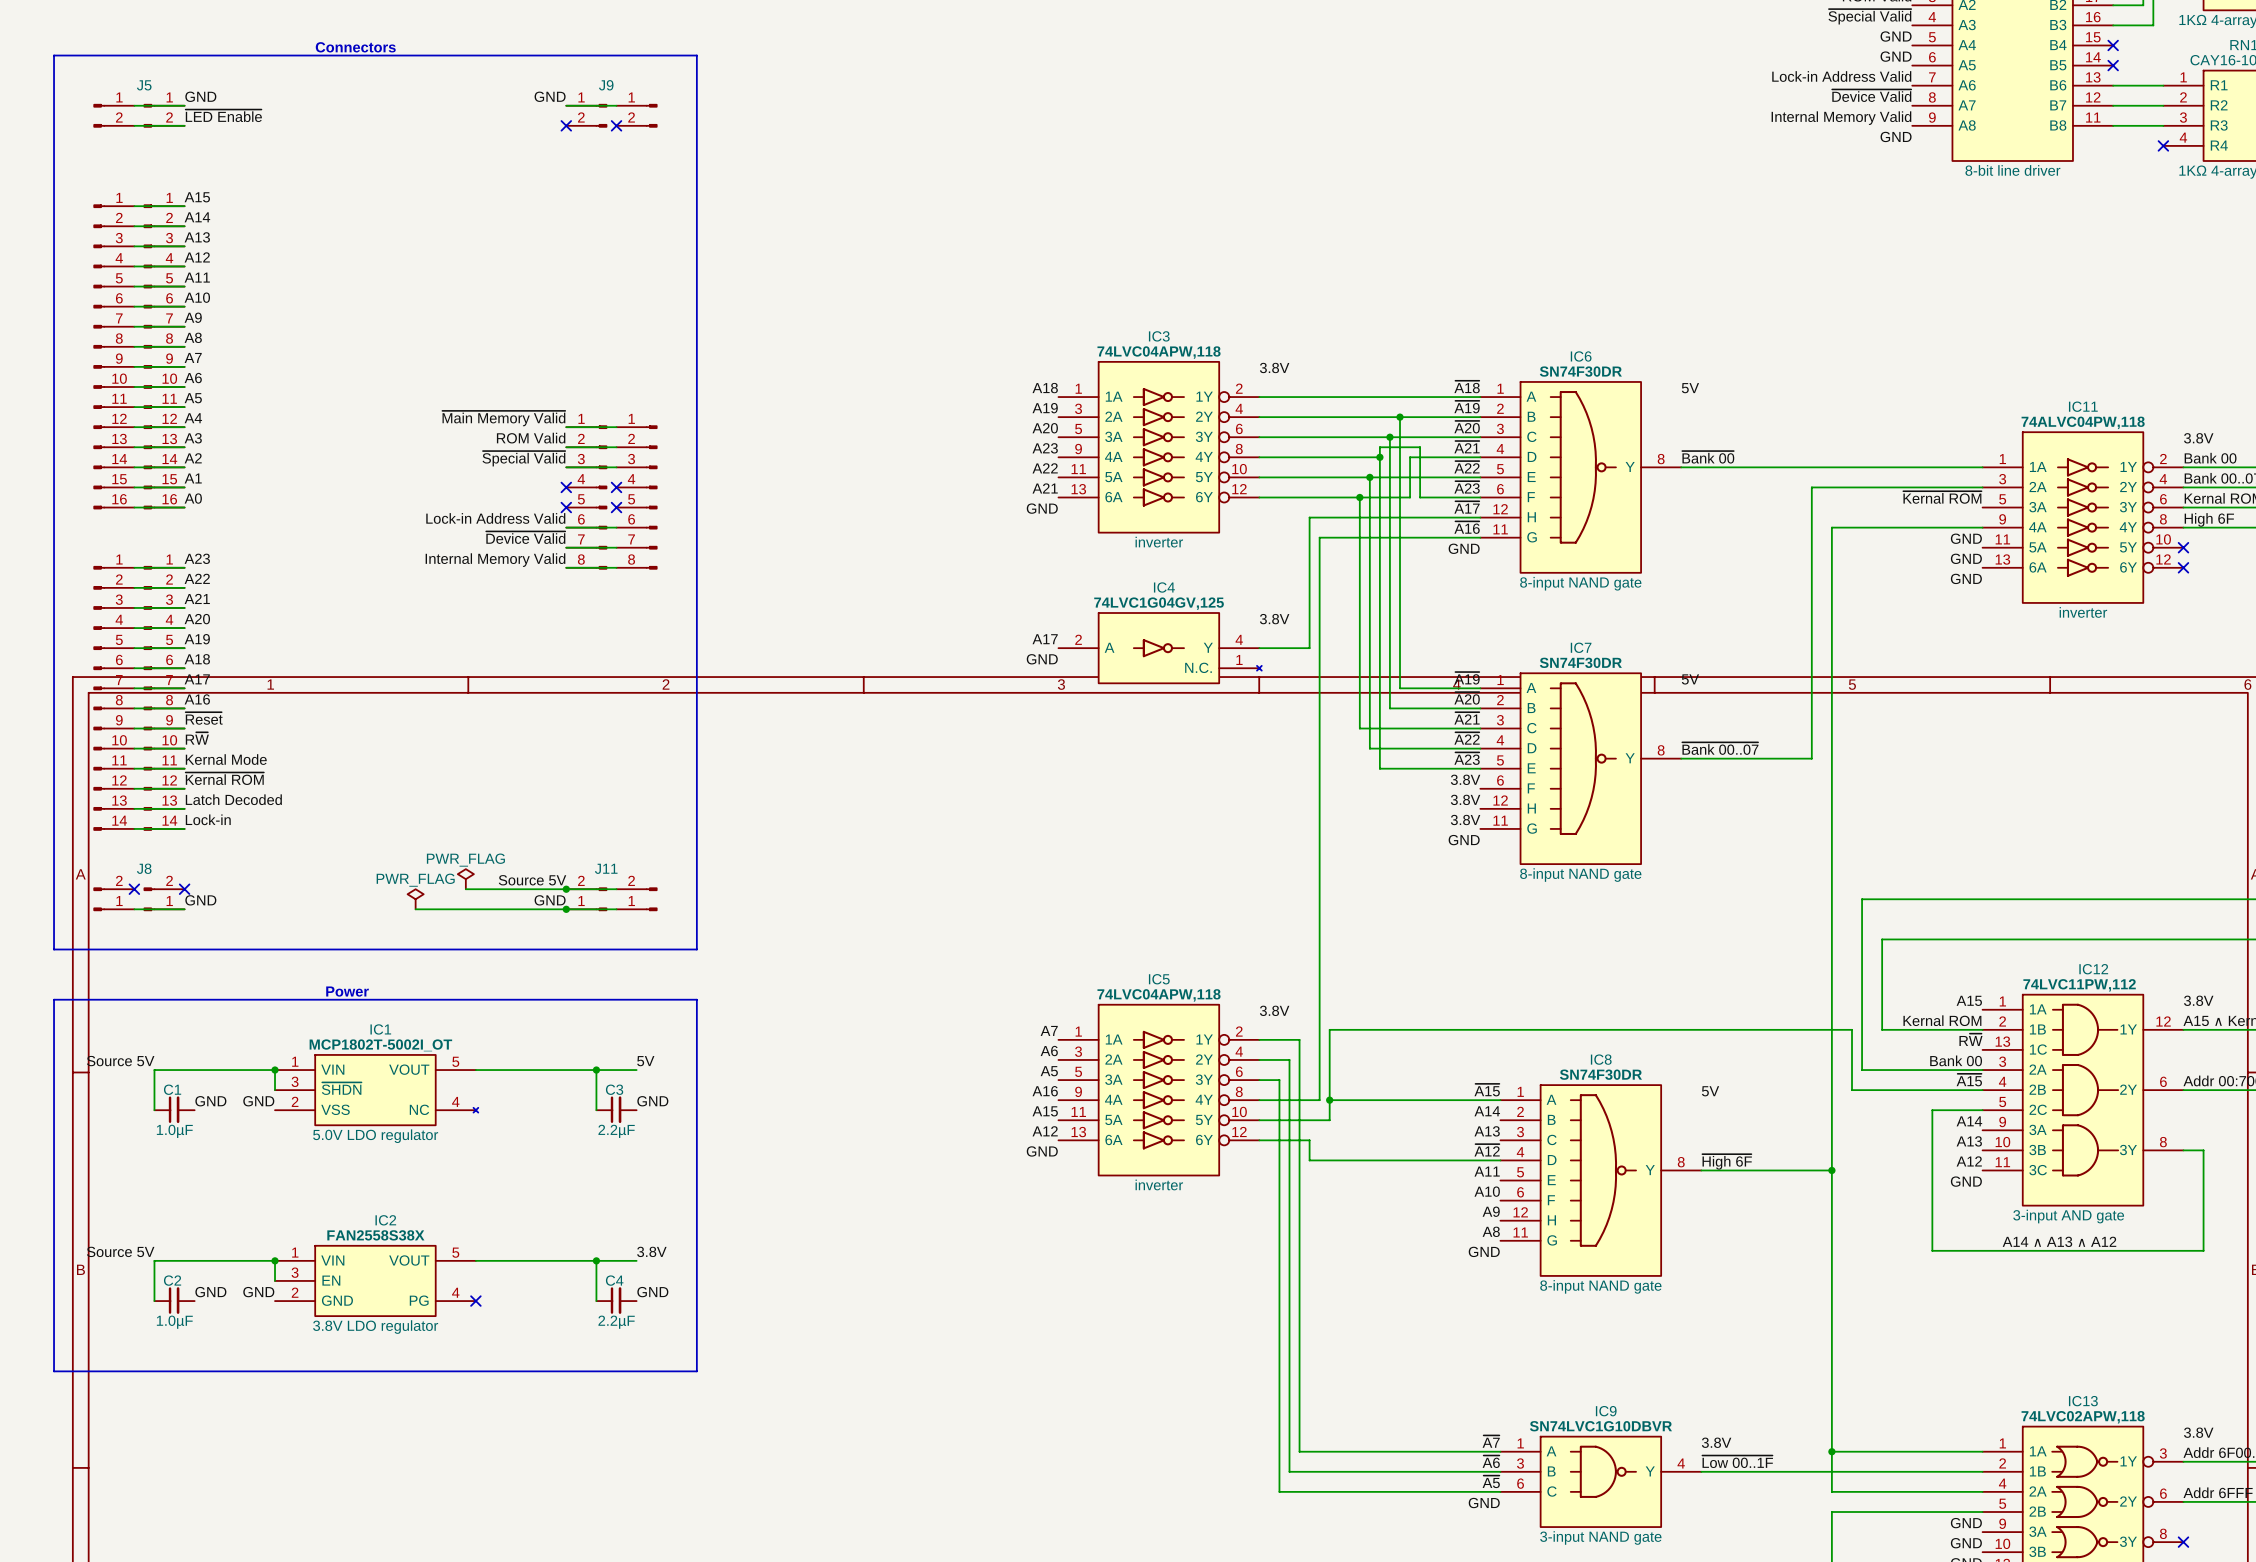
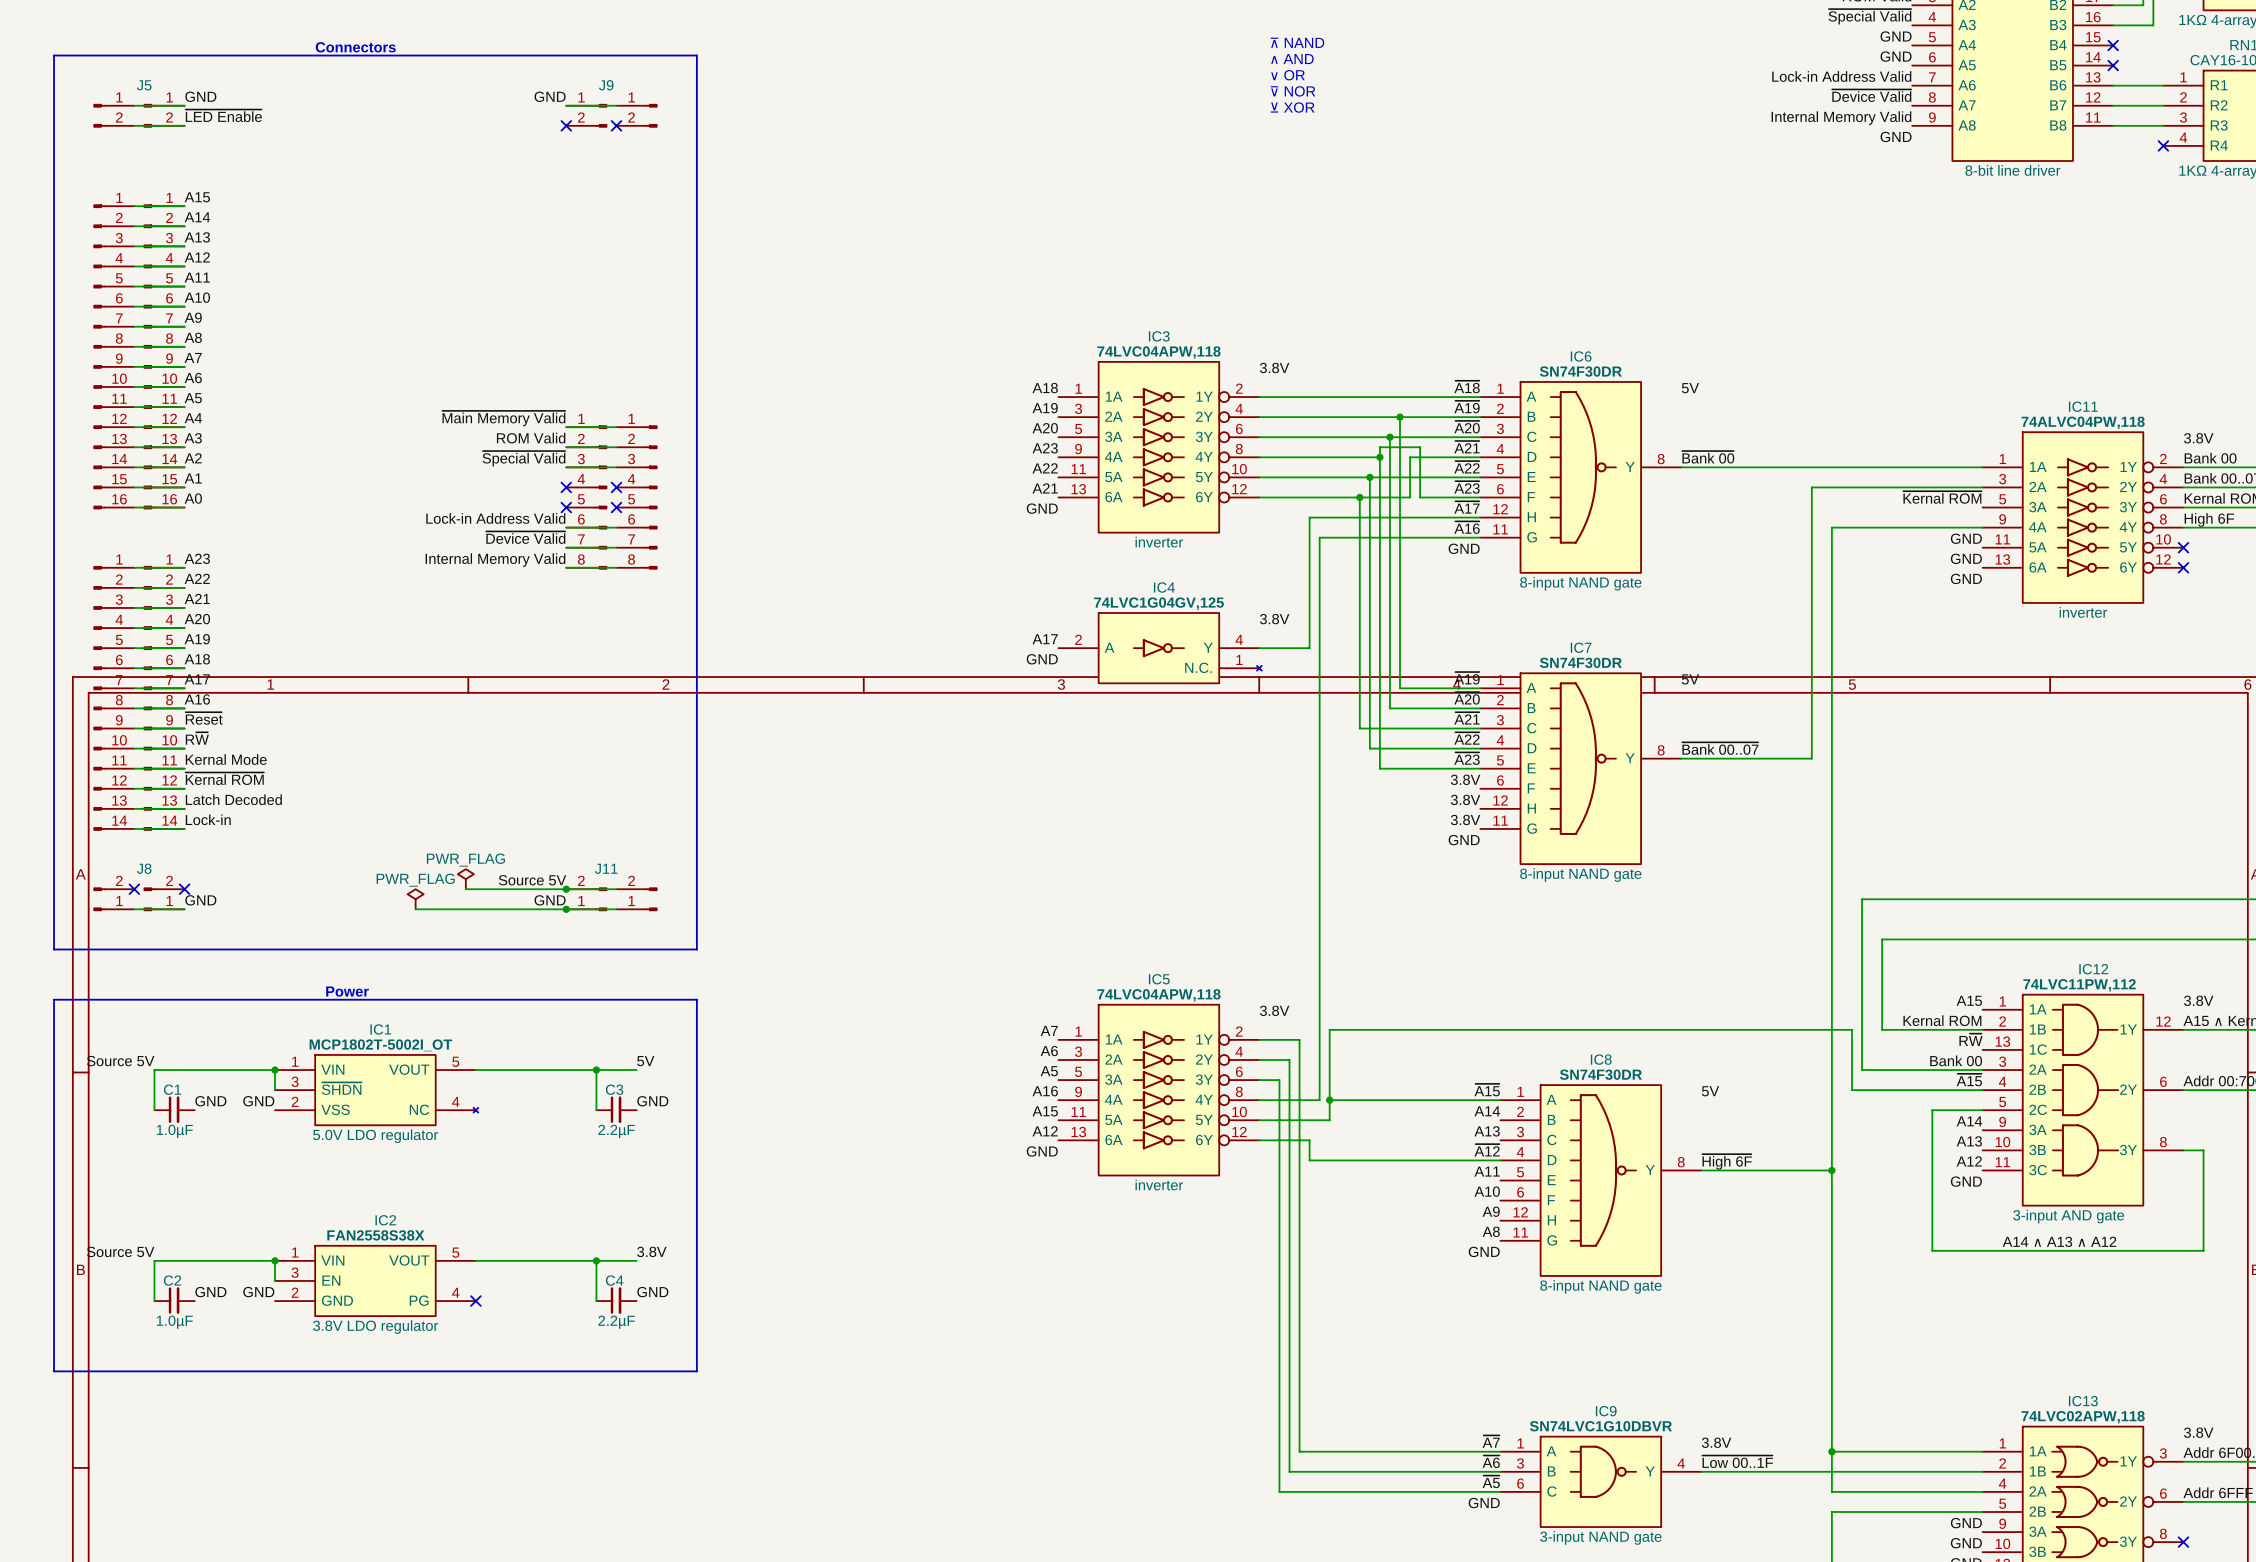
text: none -> ⊼ NAND (1297, 42)
text: none -> ∧ AND (1292, 59)
text: none -> ∨ OR (1287, 75)
text: none -> ⊽ NOR (1293, 91)
text: none -> ⊻ XOR (1292, 107)

